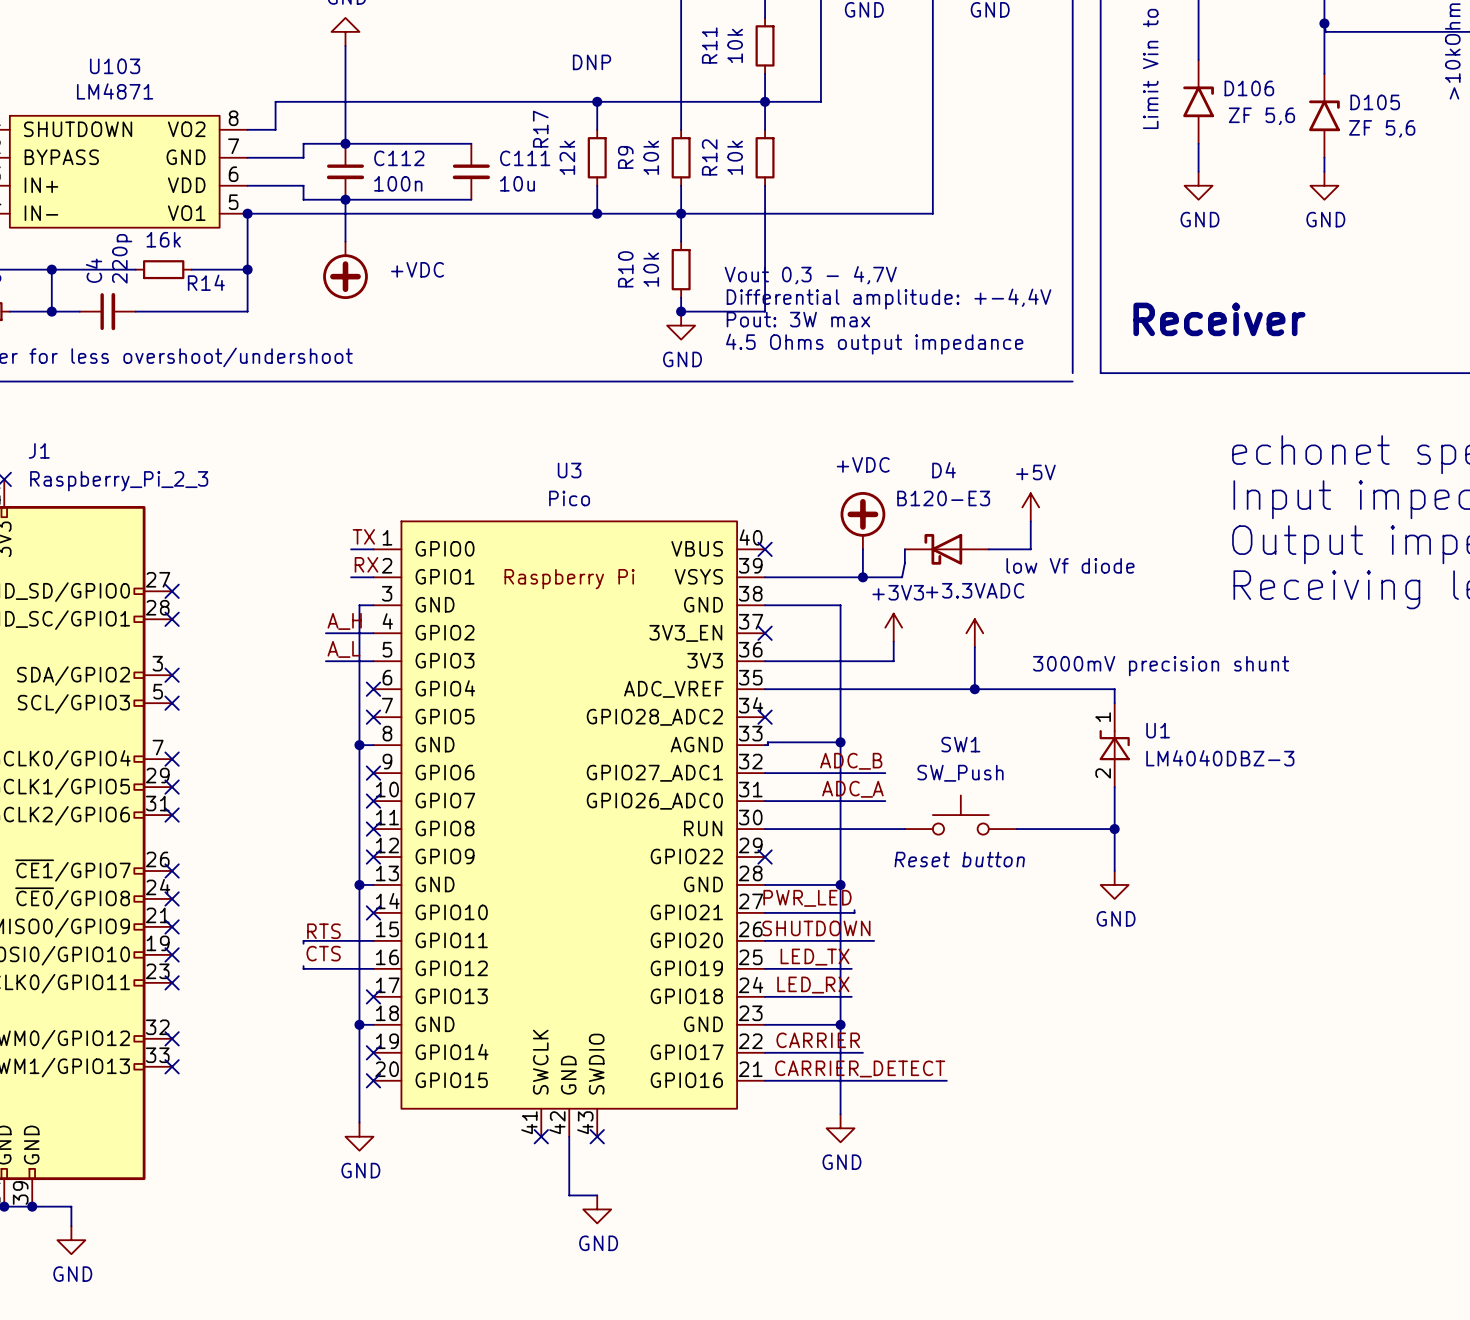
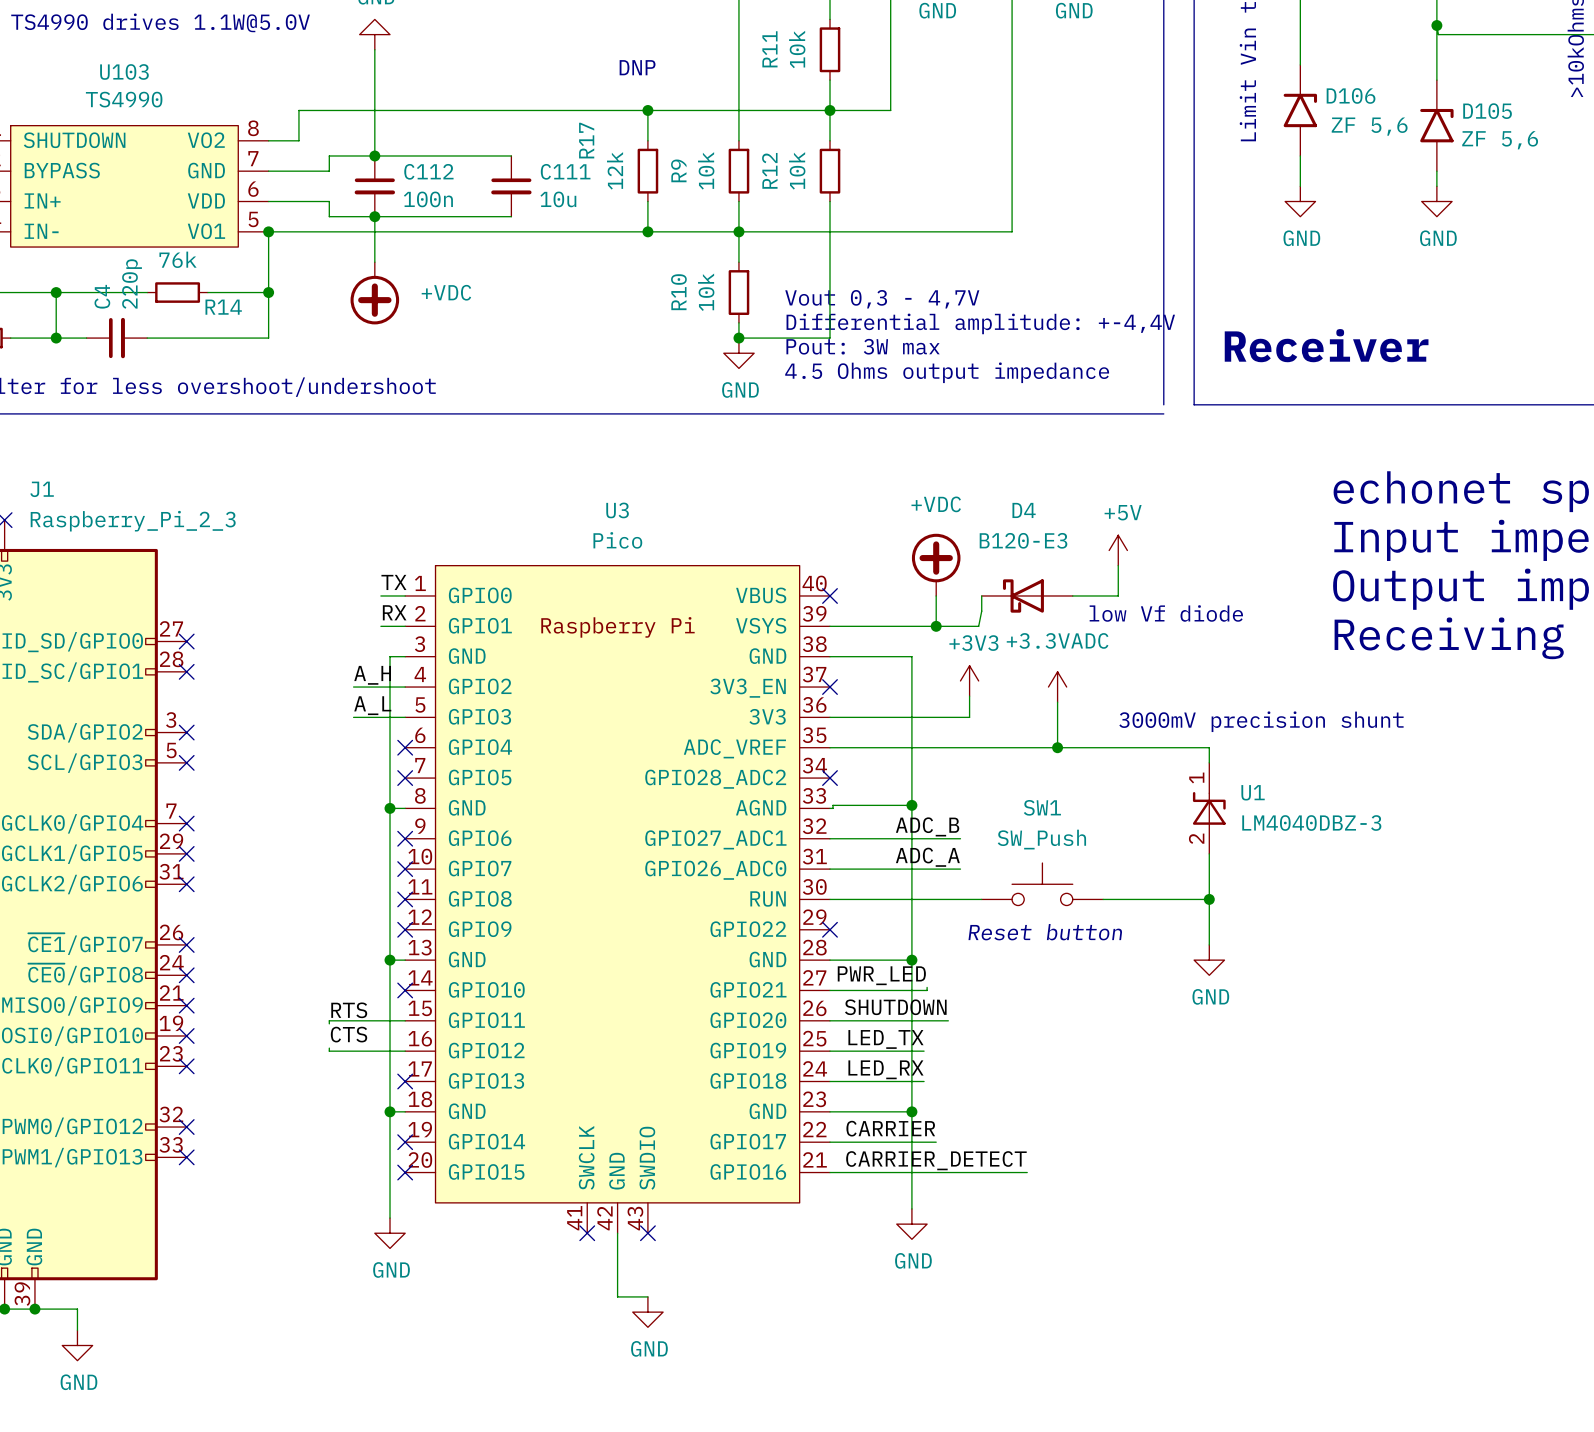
text: none -> TS4990 drives 1.1W@5.0V (160, 22)
U103 value: LM4871 (115, 91) -> TS4990 (124, 99)
R14 value: 16k (163, 239) -> 76k (178, 259)

